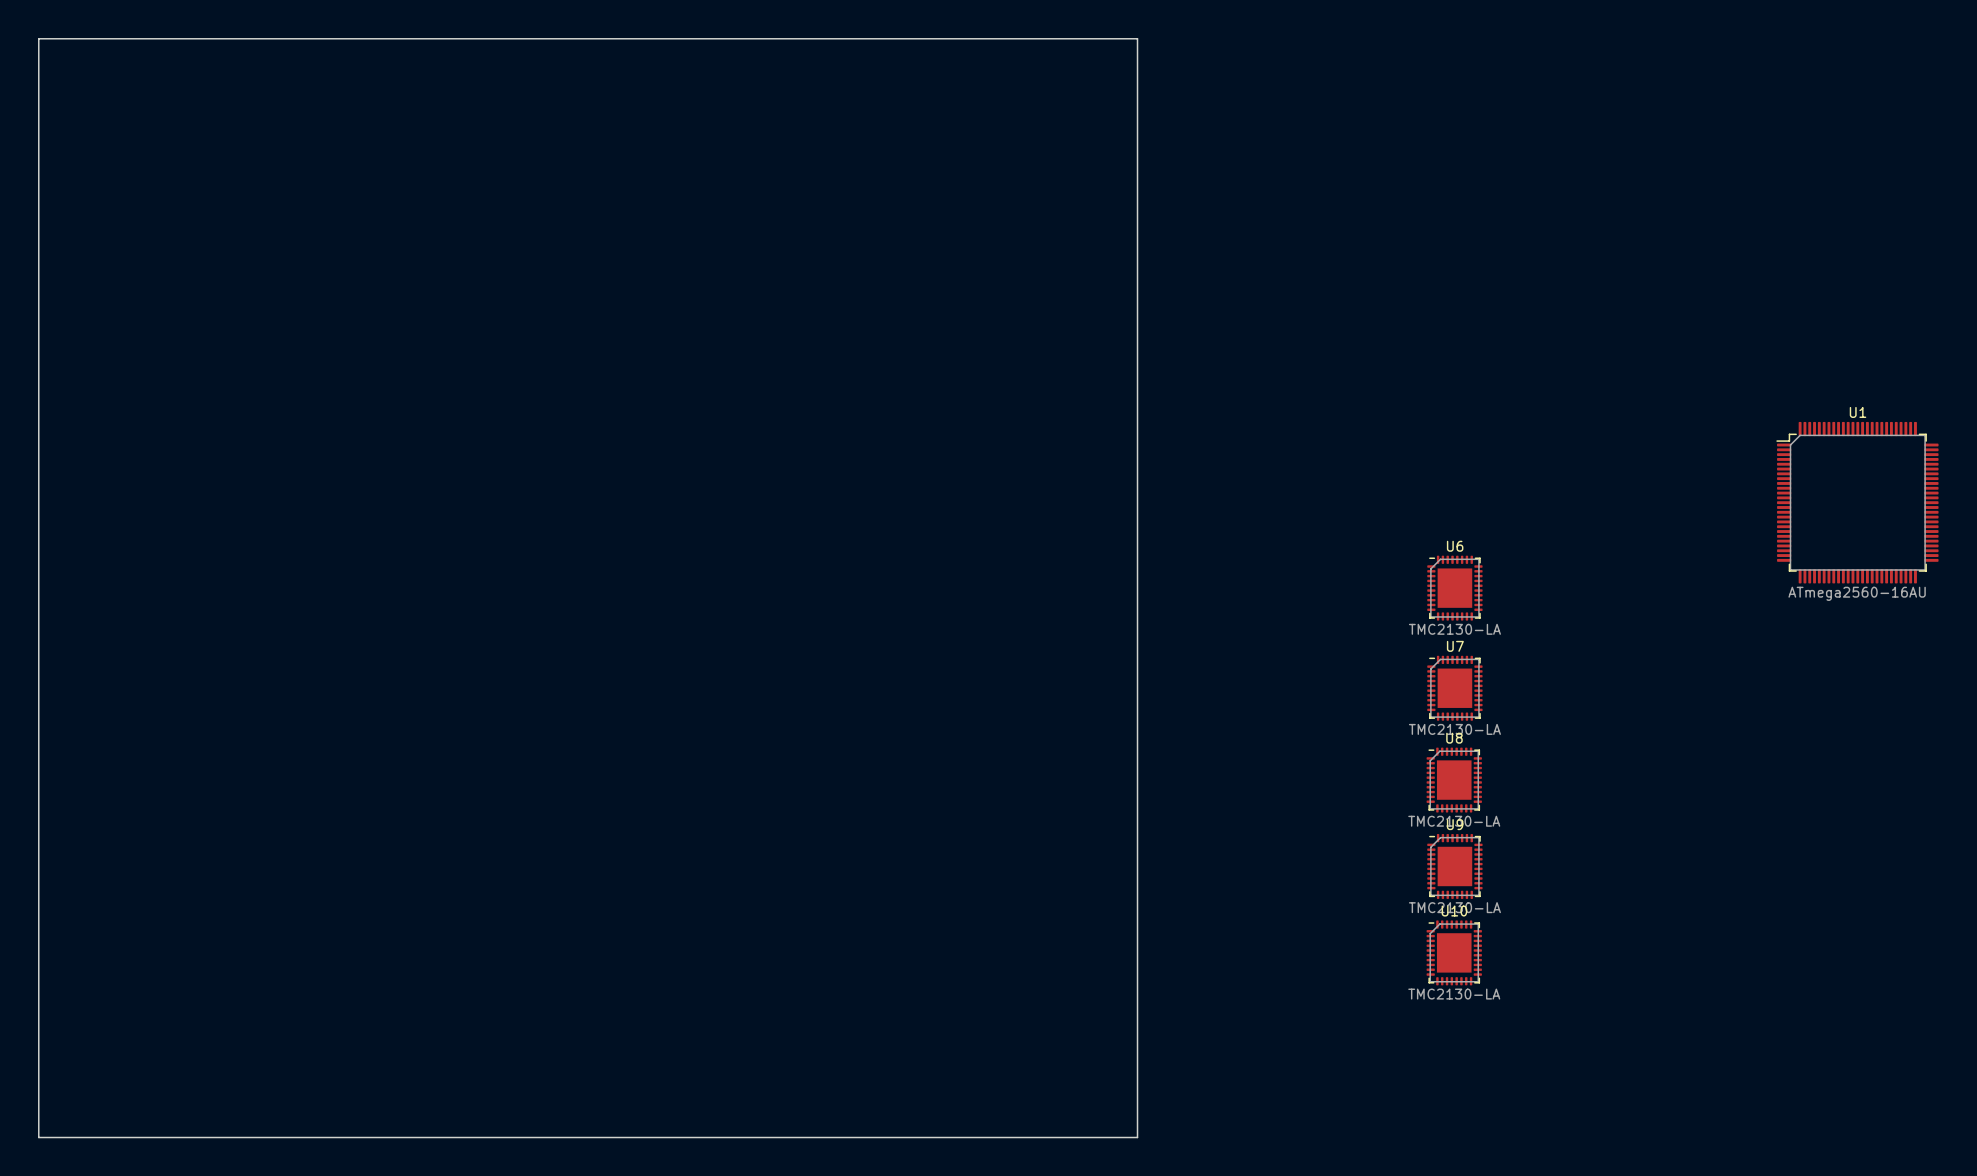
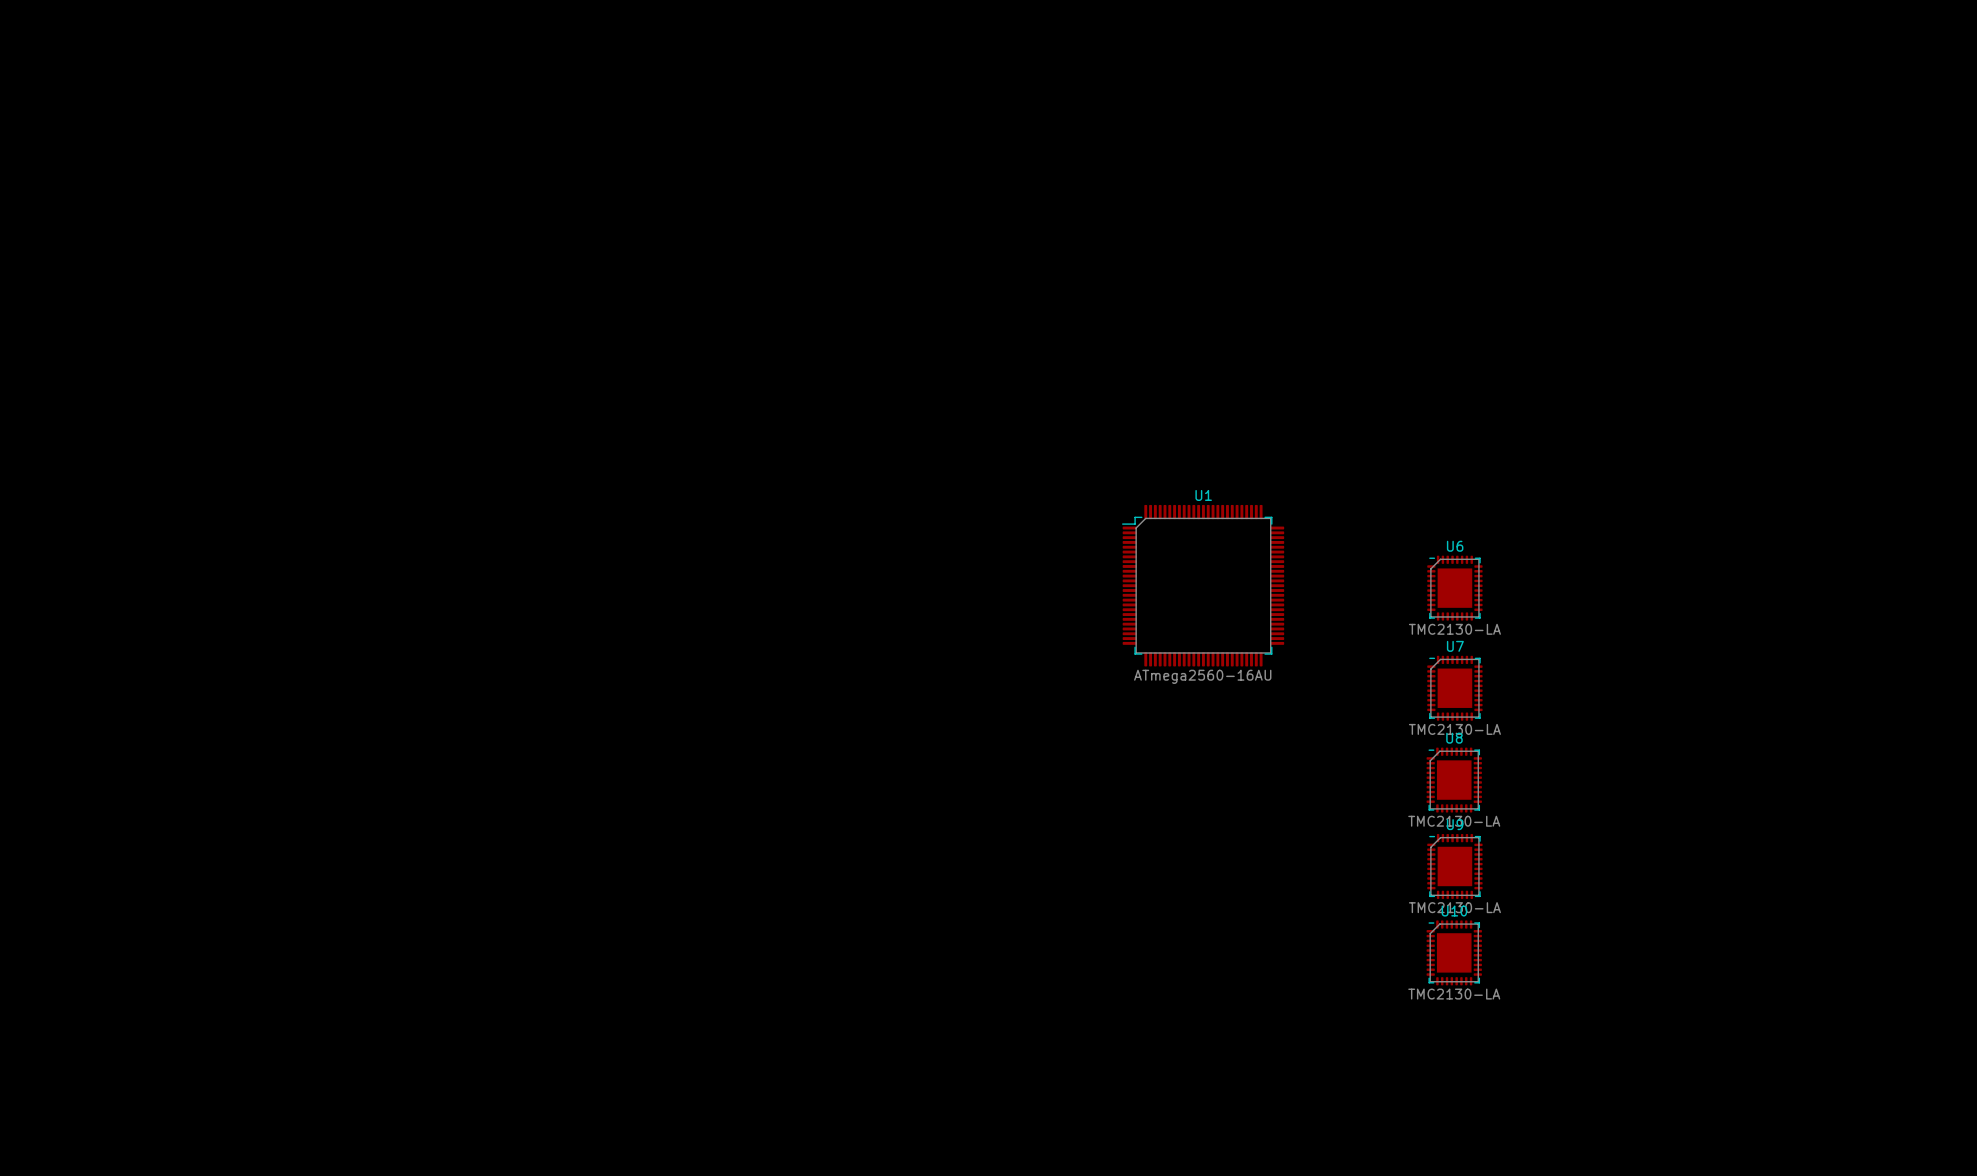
board edge: (38, 38) (1137, 38) (1137, 1137) (38, 1137) (38, 38) -> none
U1 position: (1857, 502) -> (1203, 585)

